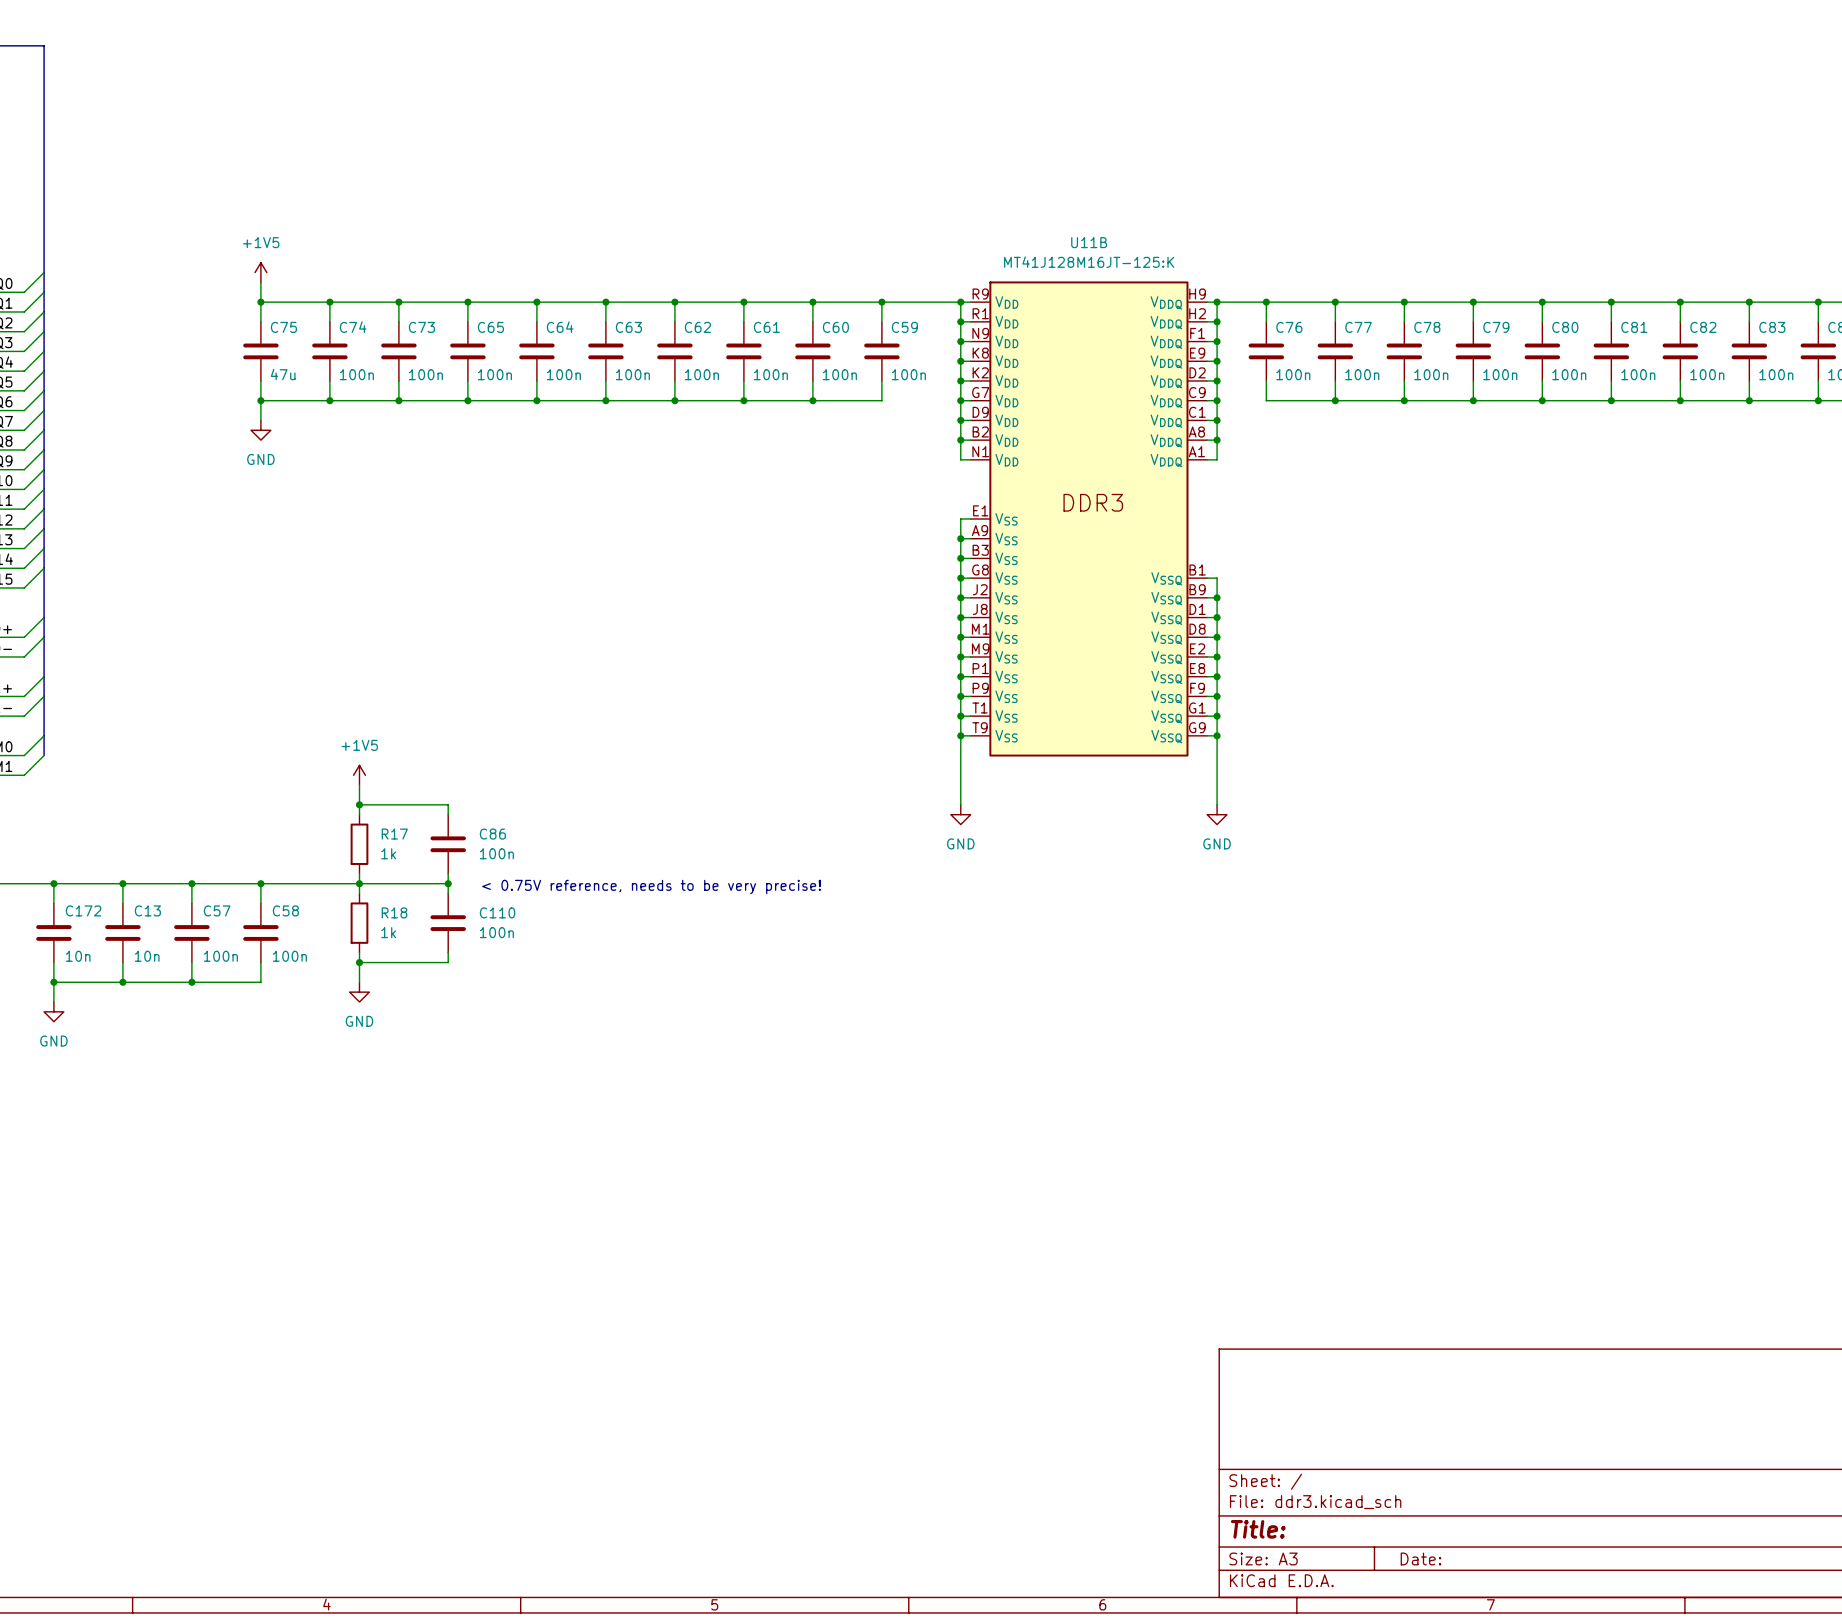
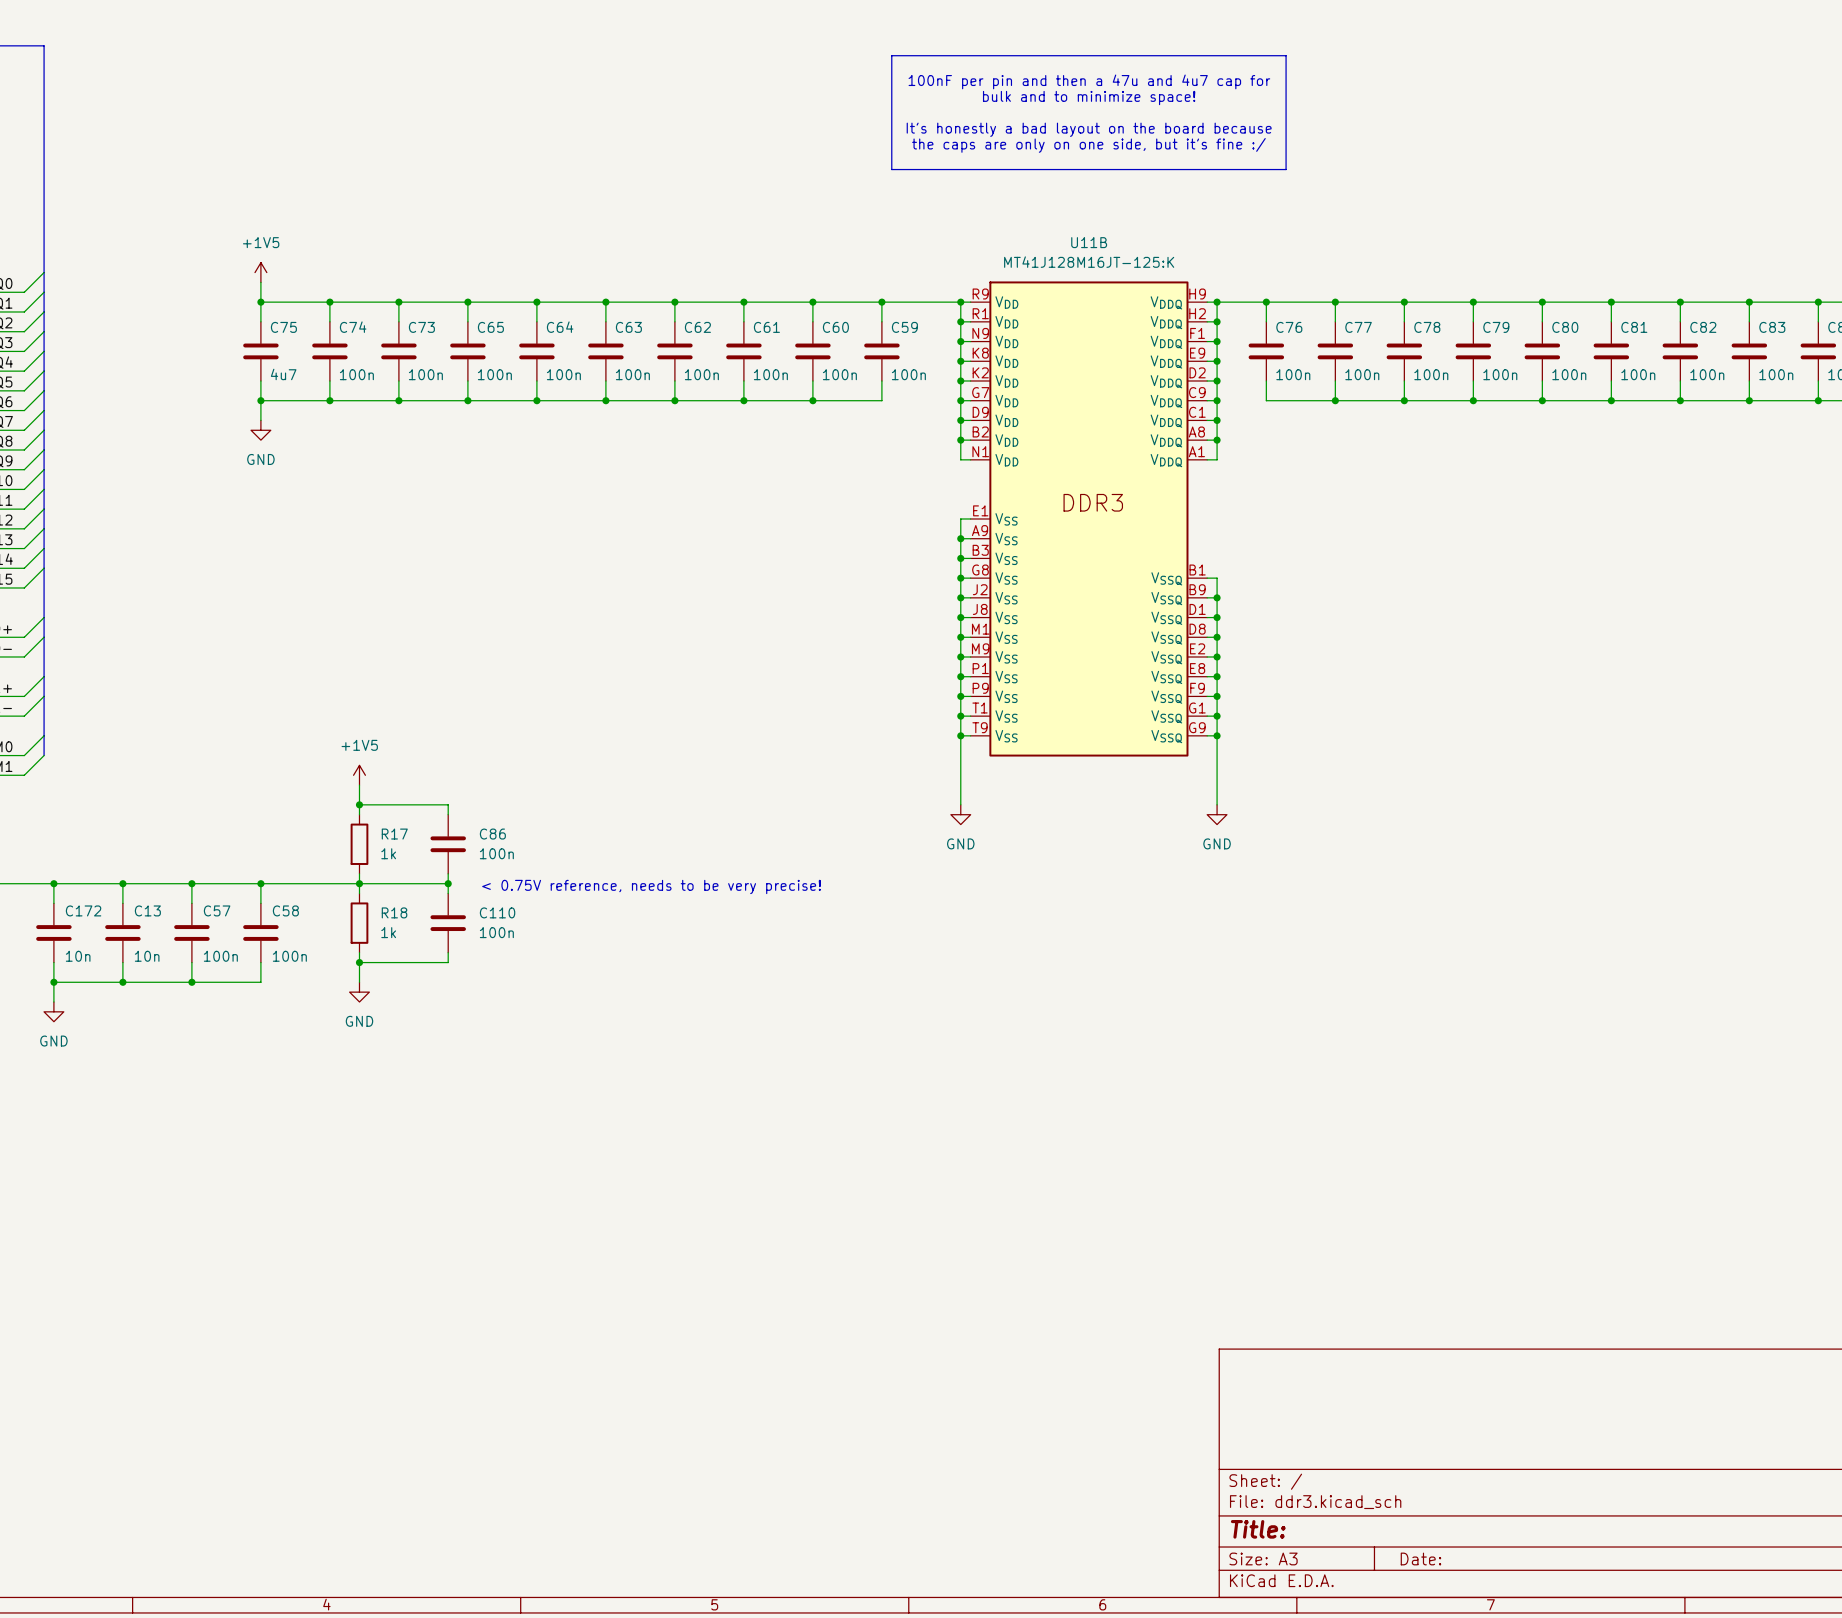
line: none -> (891, 55) (1286, 55) (1286, 169) (891, 169) (891, 55)
text: none -> 100nF per pin and then a 47u and 4u7 cap for (1089, 81)
text: none -> bulk and to minimize space! (1089, 98)
text: none -> It's honestly a bad layout on the board because (1089, 129)
text: none -> the caps are only on one side, but it's fine :/ (1088, 145)
C75 value: 47u (283, 374) -> 4u7 (283, 374)

